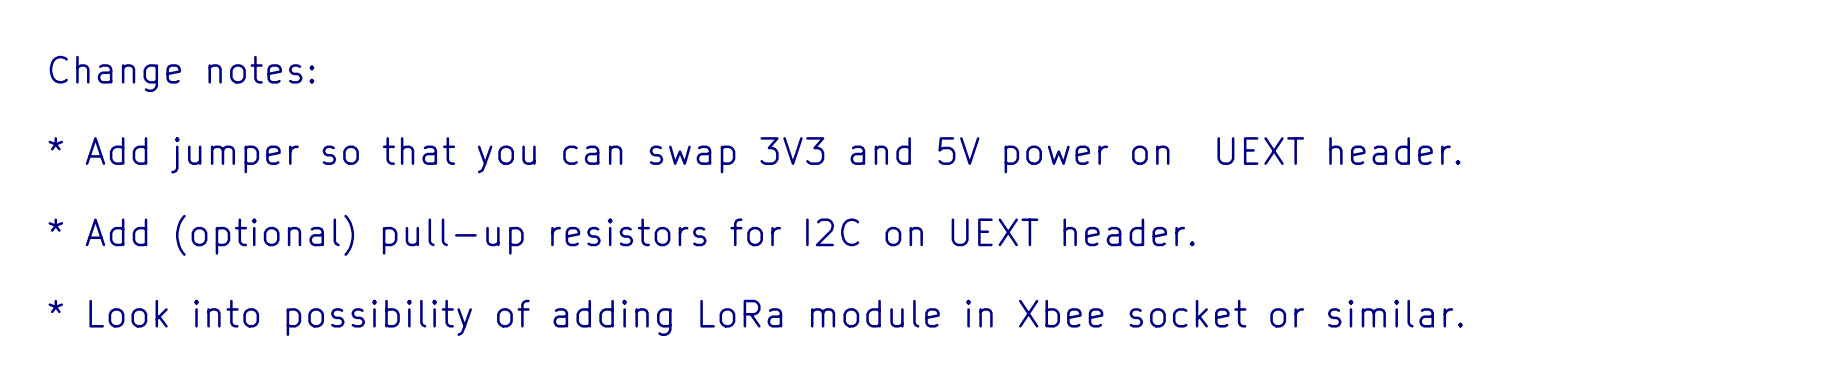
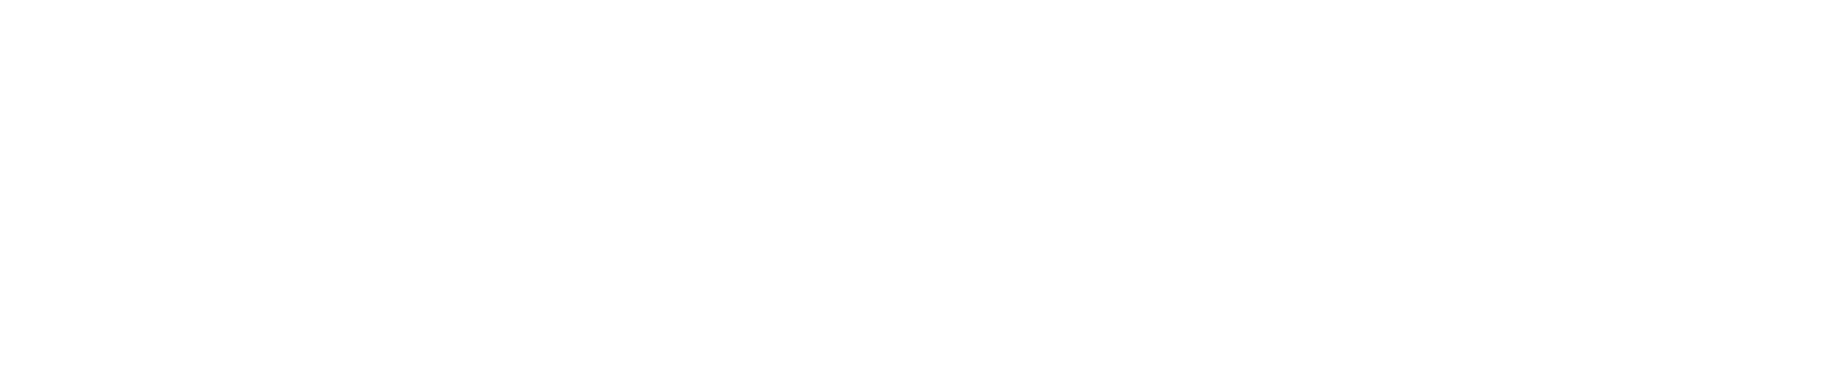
text: Change notes: (182, 73) -> none
text: * Add jumper so that you can swap 3V3 and 5V power on UEXT header. (754, 155) -> none
text: * Add (optional) pull-up resistors for I2C on UEXT header. (621, 235) -> none
text: * Look into possibility of adding LoRa module in Xbee socket or similar. (755, 317) -> none

